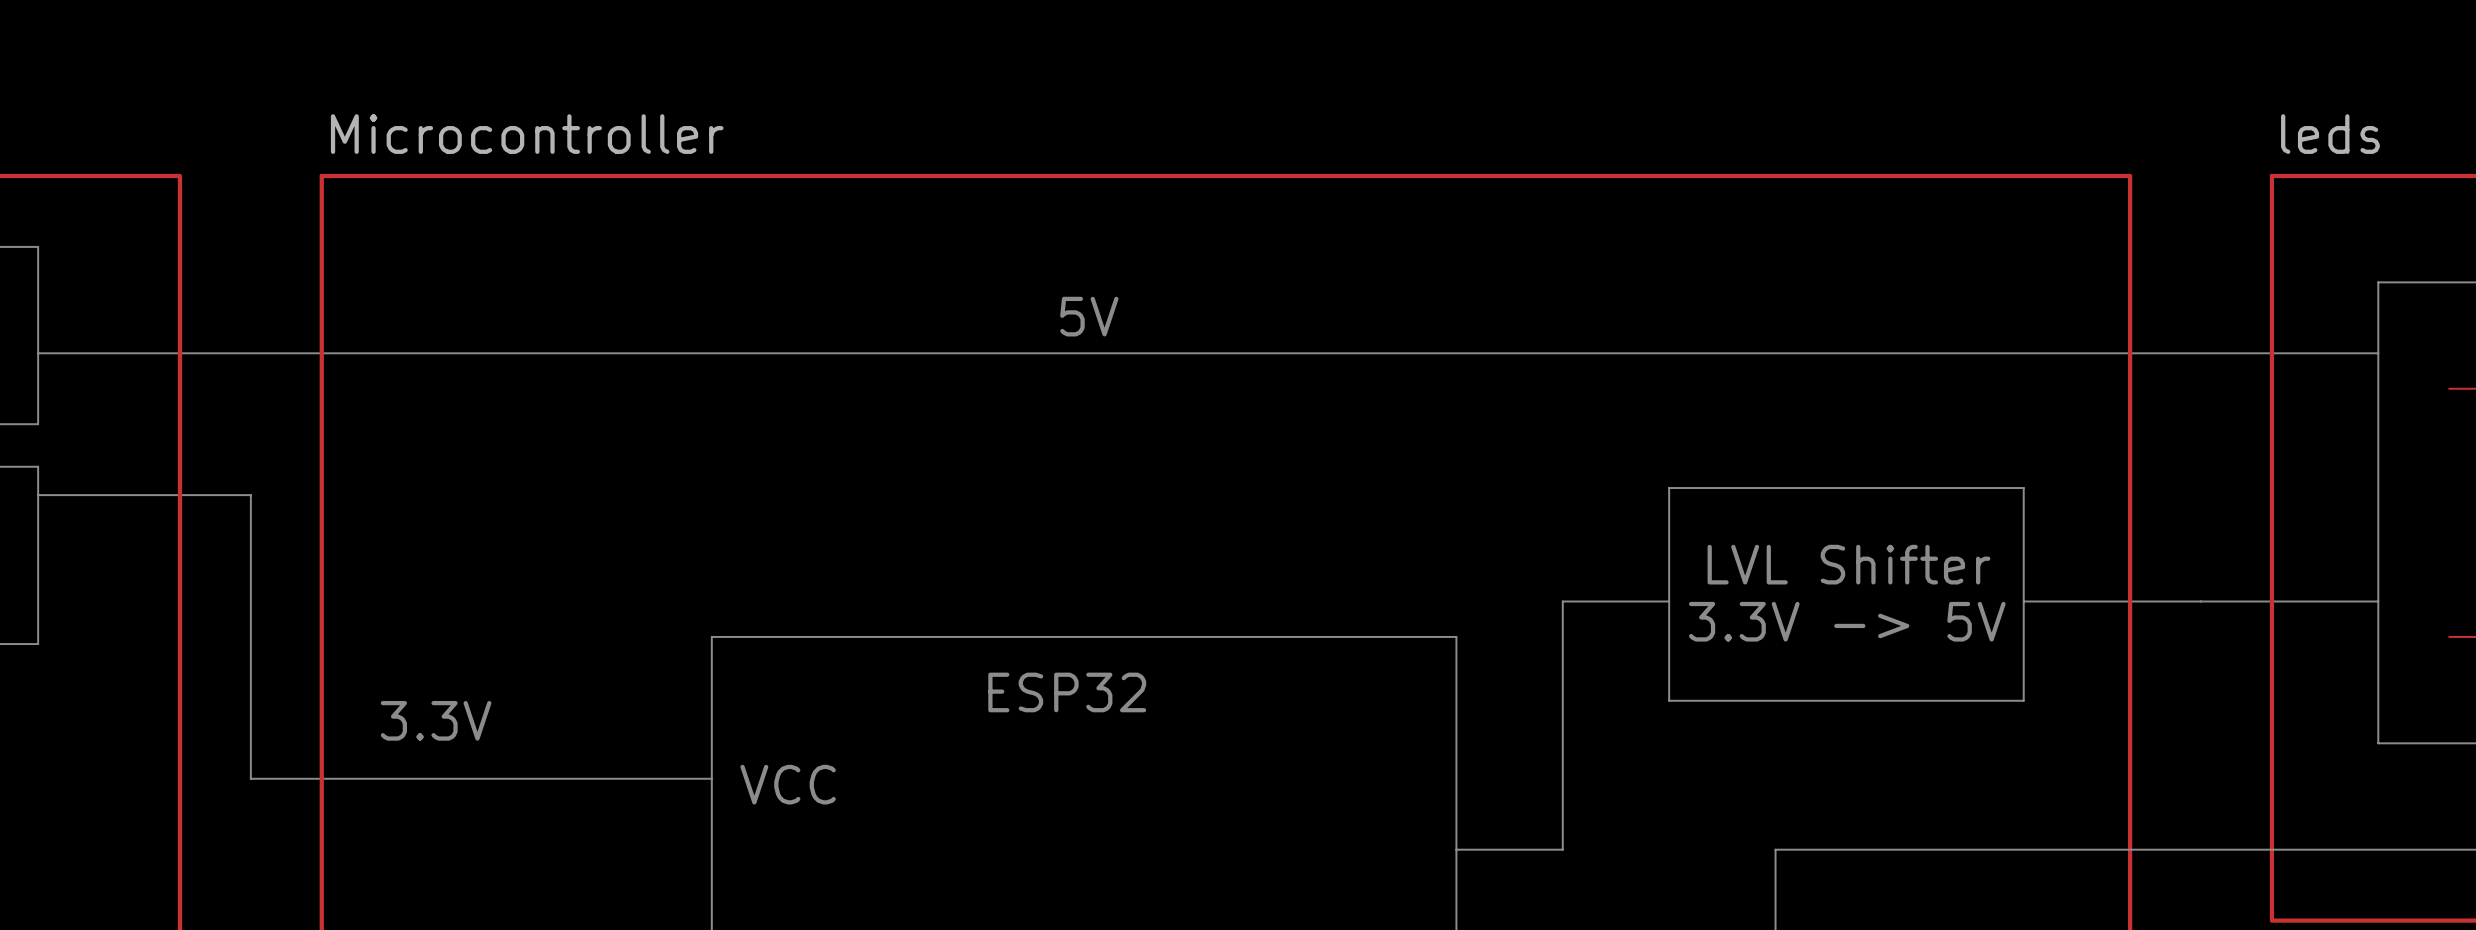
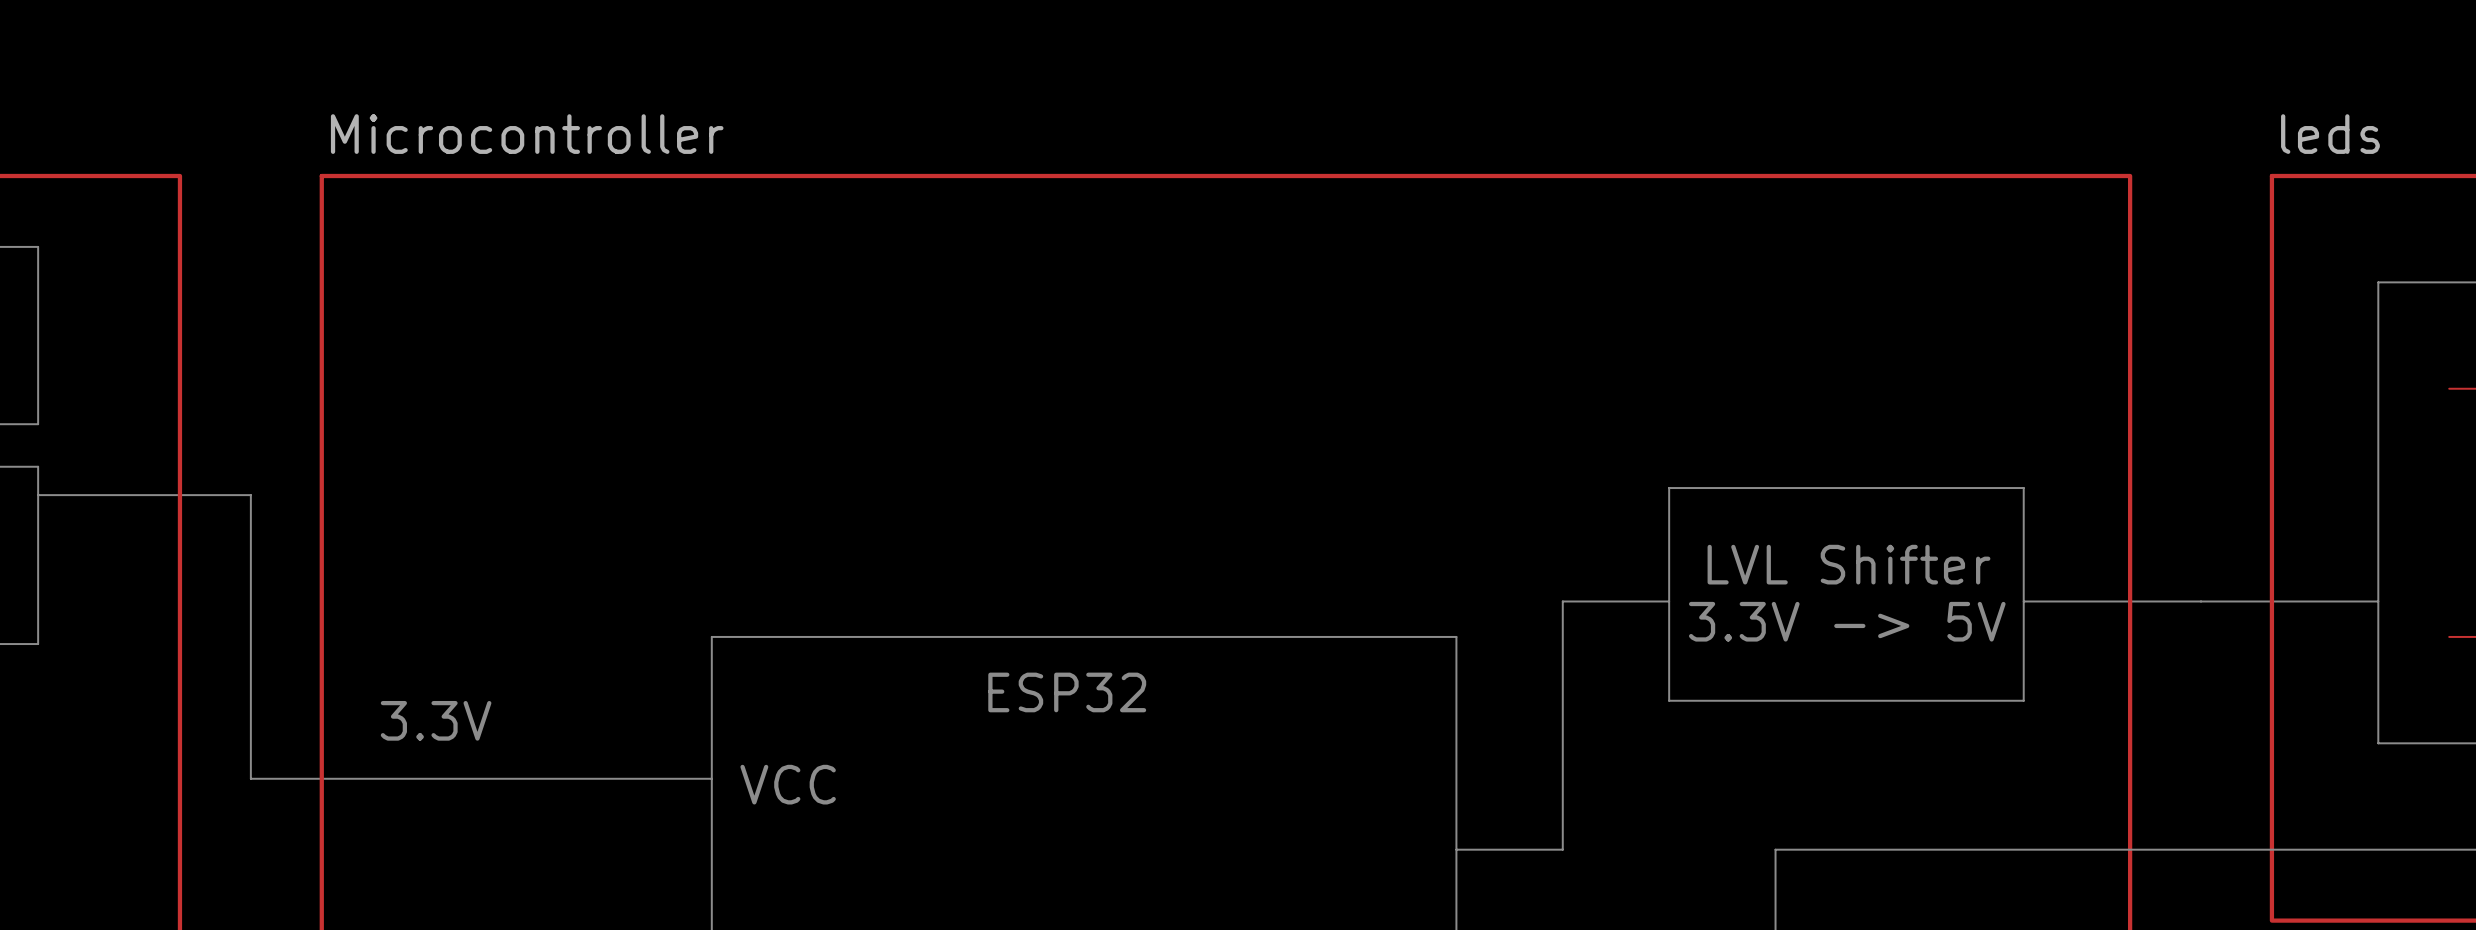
text: 5V (1089, 316) -> none
line: (38, 353) (2378, 353) -> none

